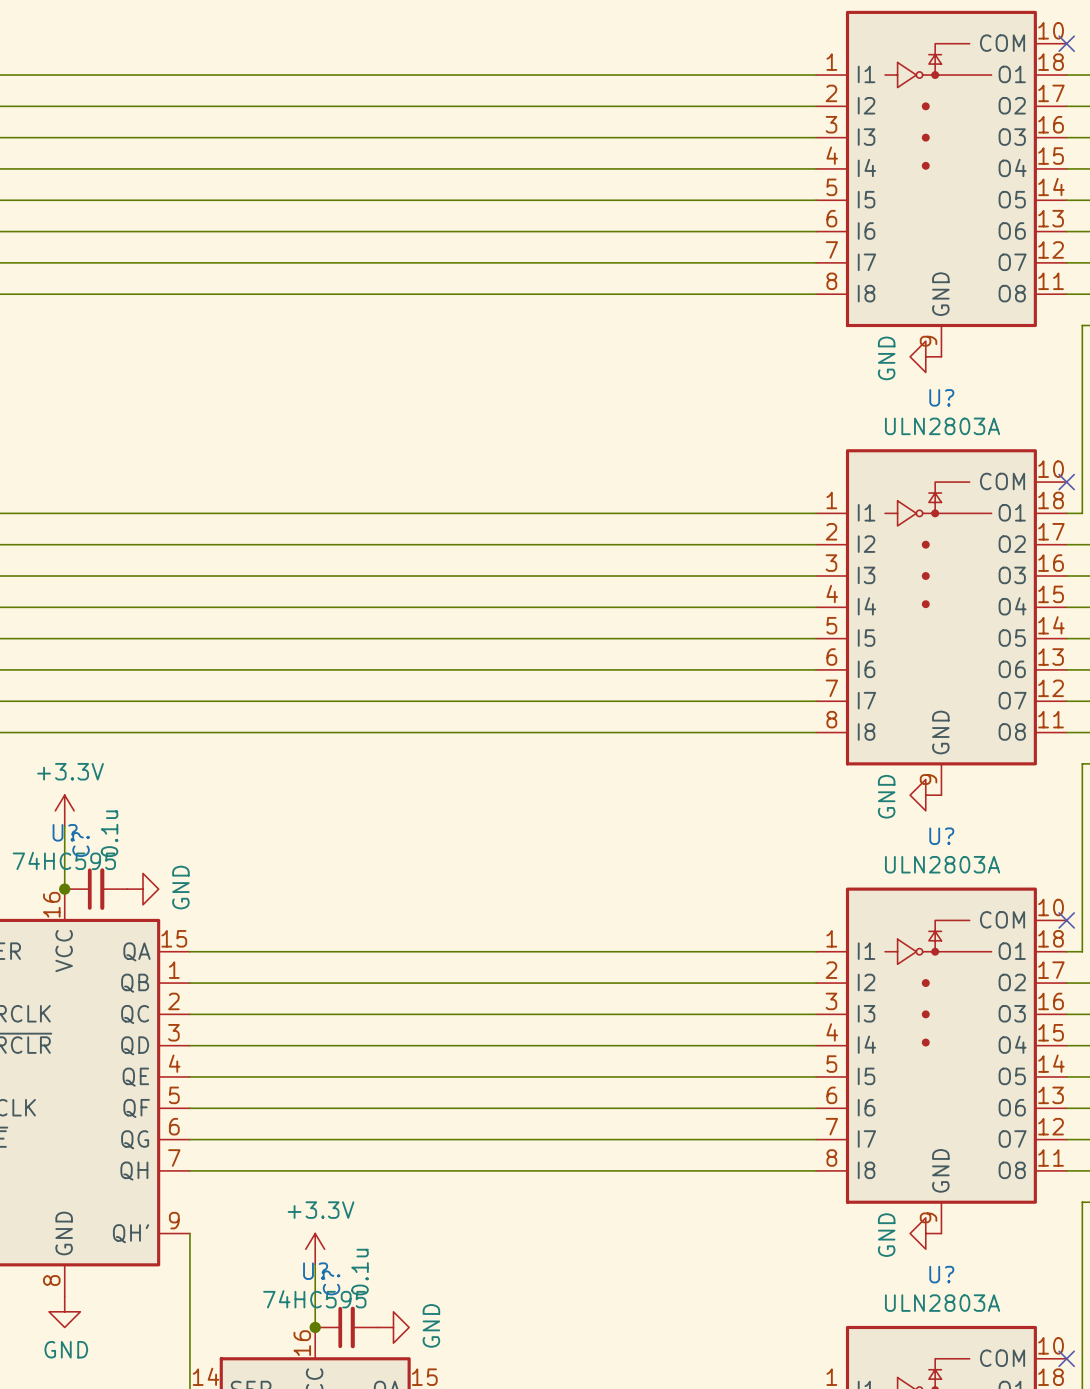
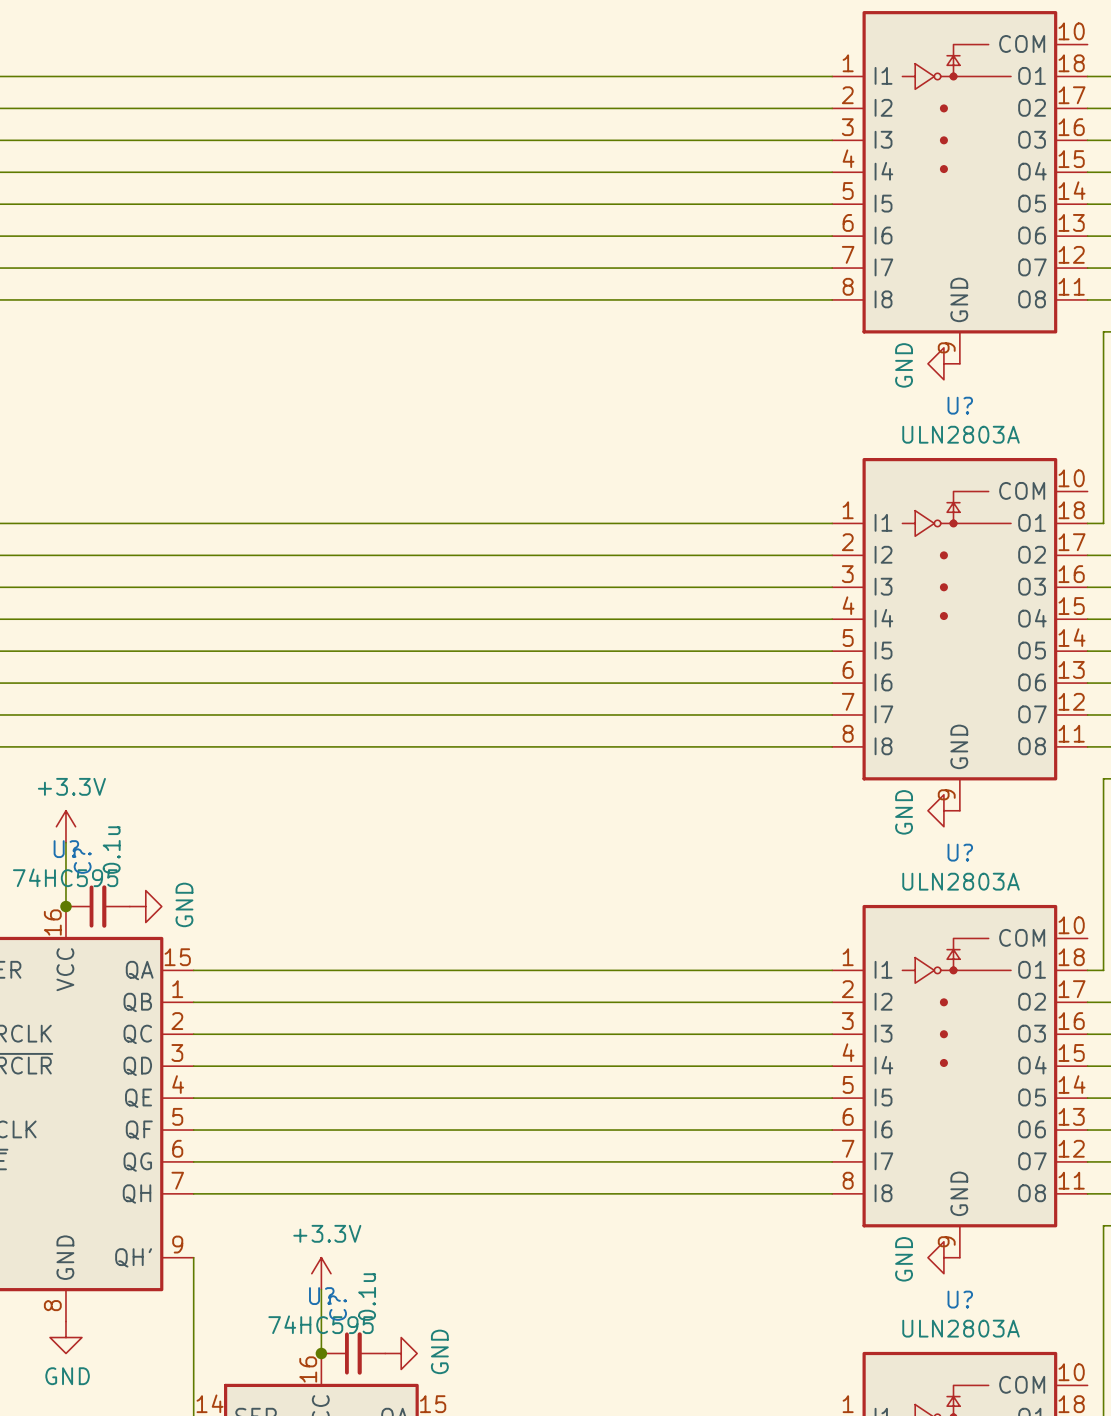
no-connect mark: (1066, 43) -> none
no-connect mark: (1066, 482) -> none
no-connect mark: (1066, 920) -> none
no-connect mark: (1066, 1358) -> none

